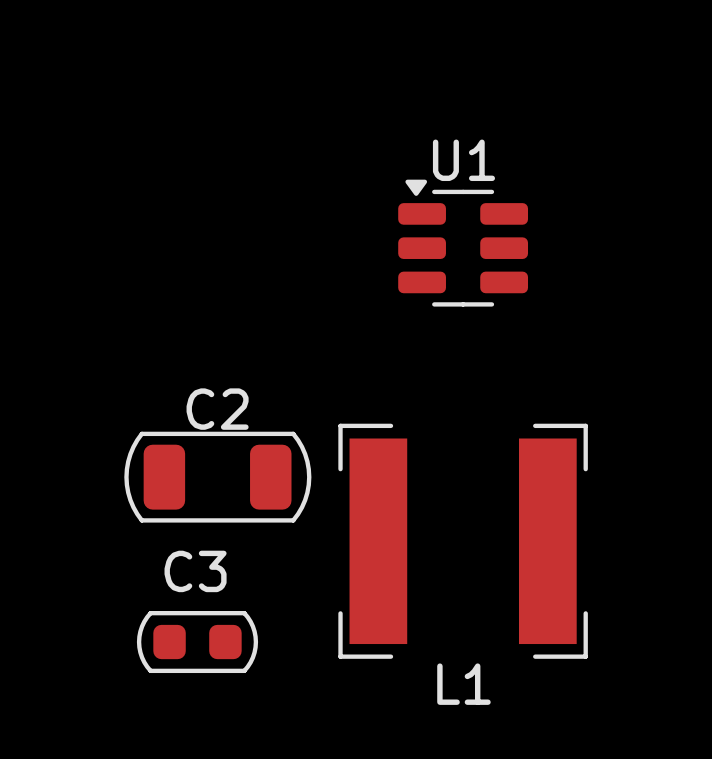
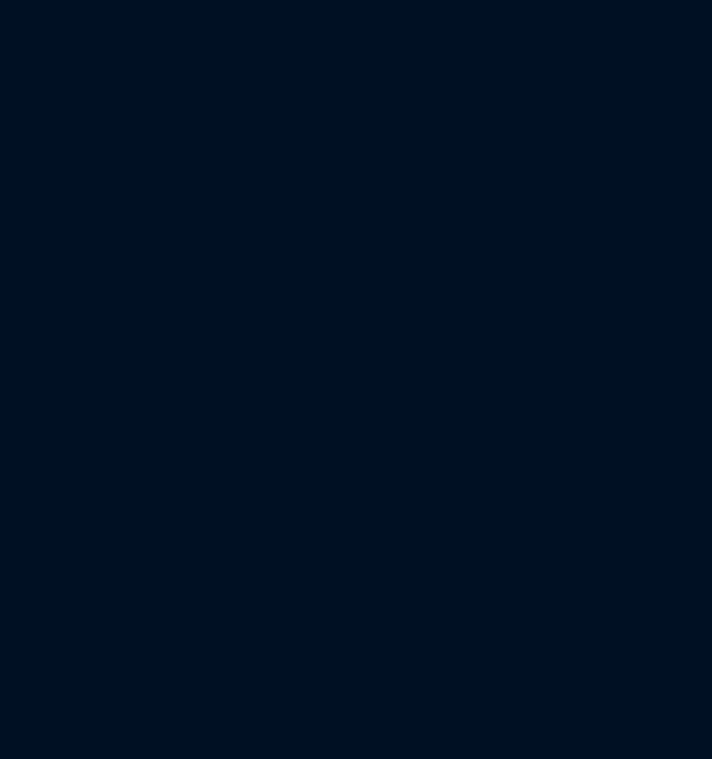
U1: (463, 243) -> none
C2: (217, 477) -> none
L1: (463, 541) -> none
C3: (197, 642) -> none

